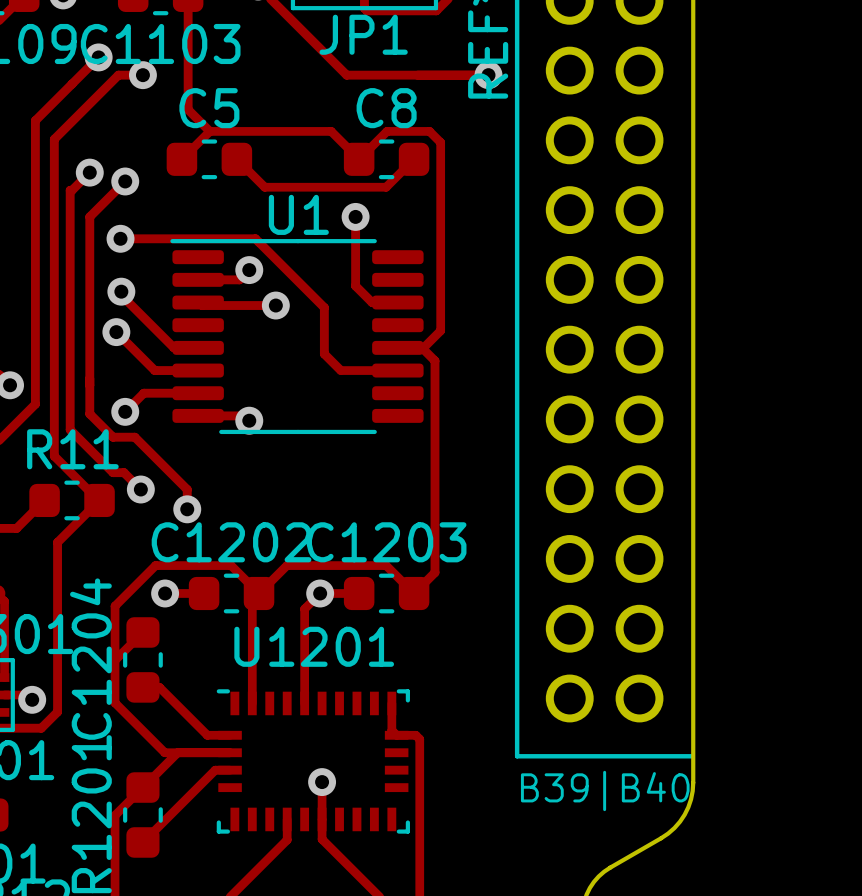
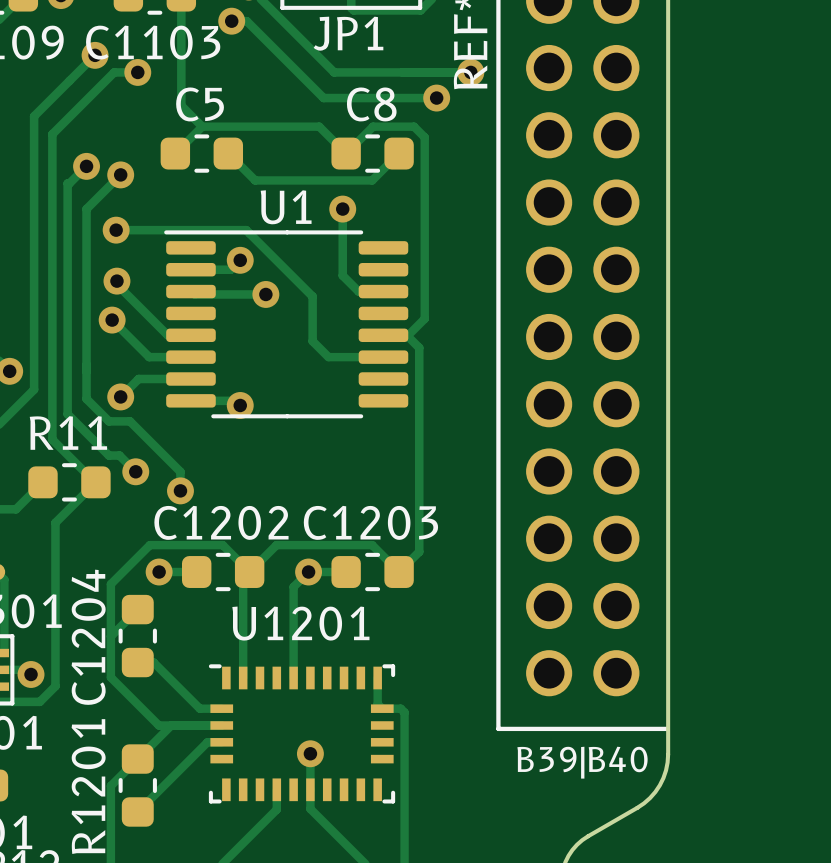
track: none -> (231, 21) (246, 21) (323, 98) (436, 98)
via: none -> (231, 21)
via: none -> (436, 98)

